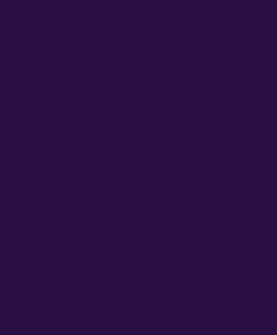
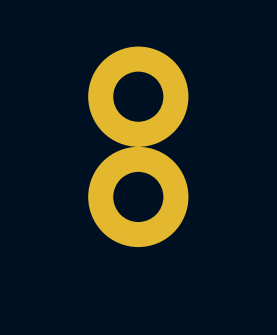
part: none -> (138, 146)

